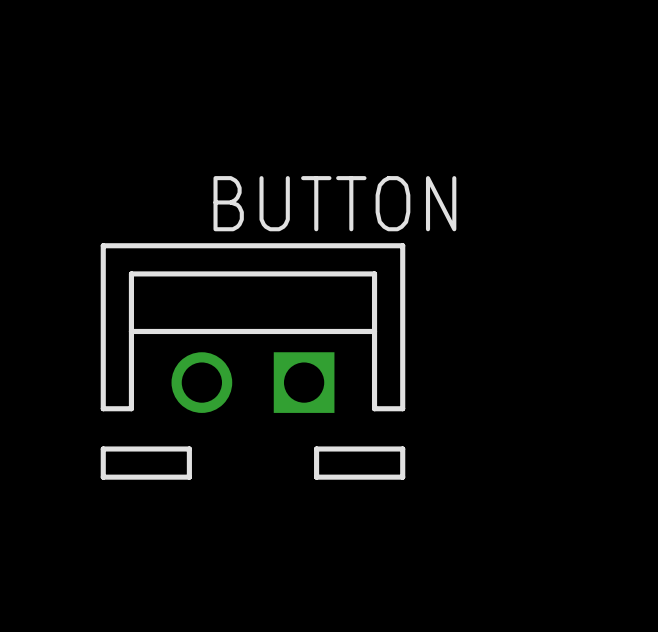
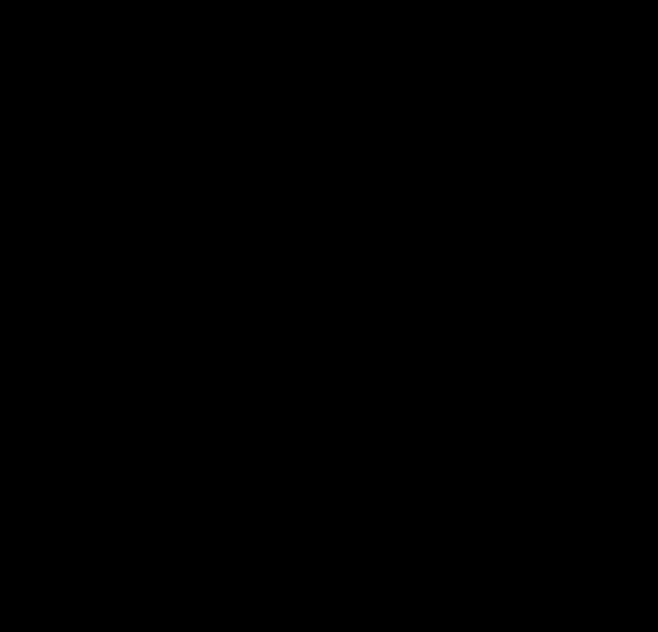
BUTTON: (252, 361) -> none

